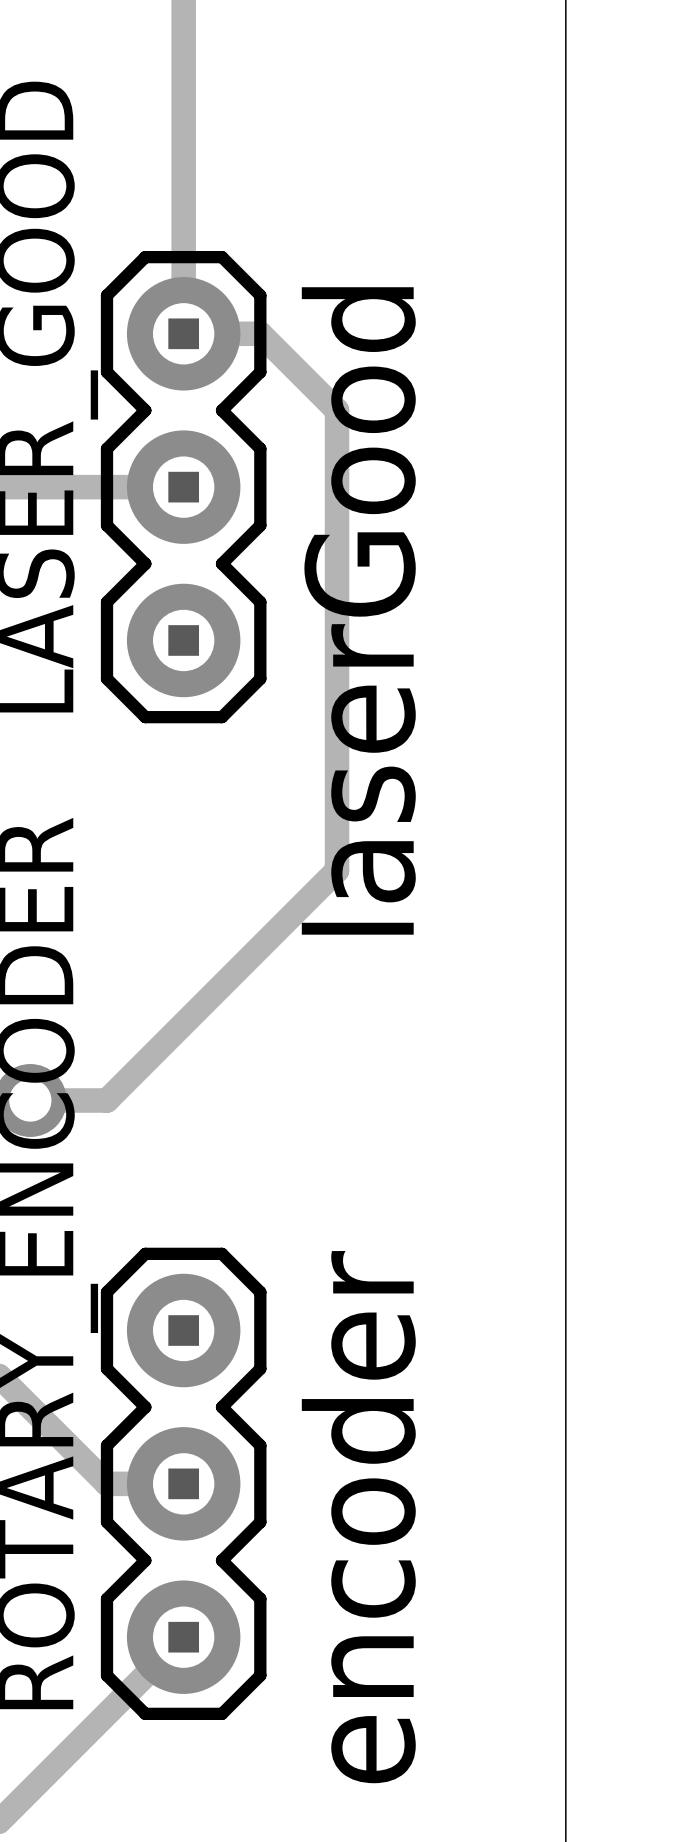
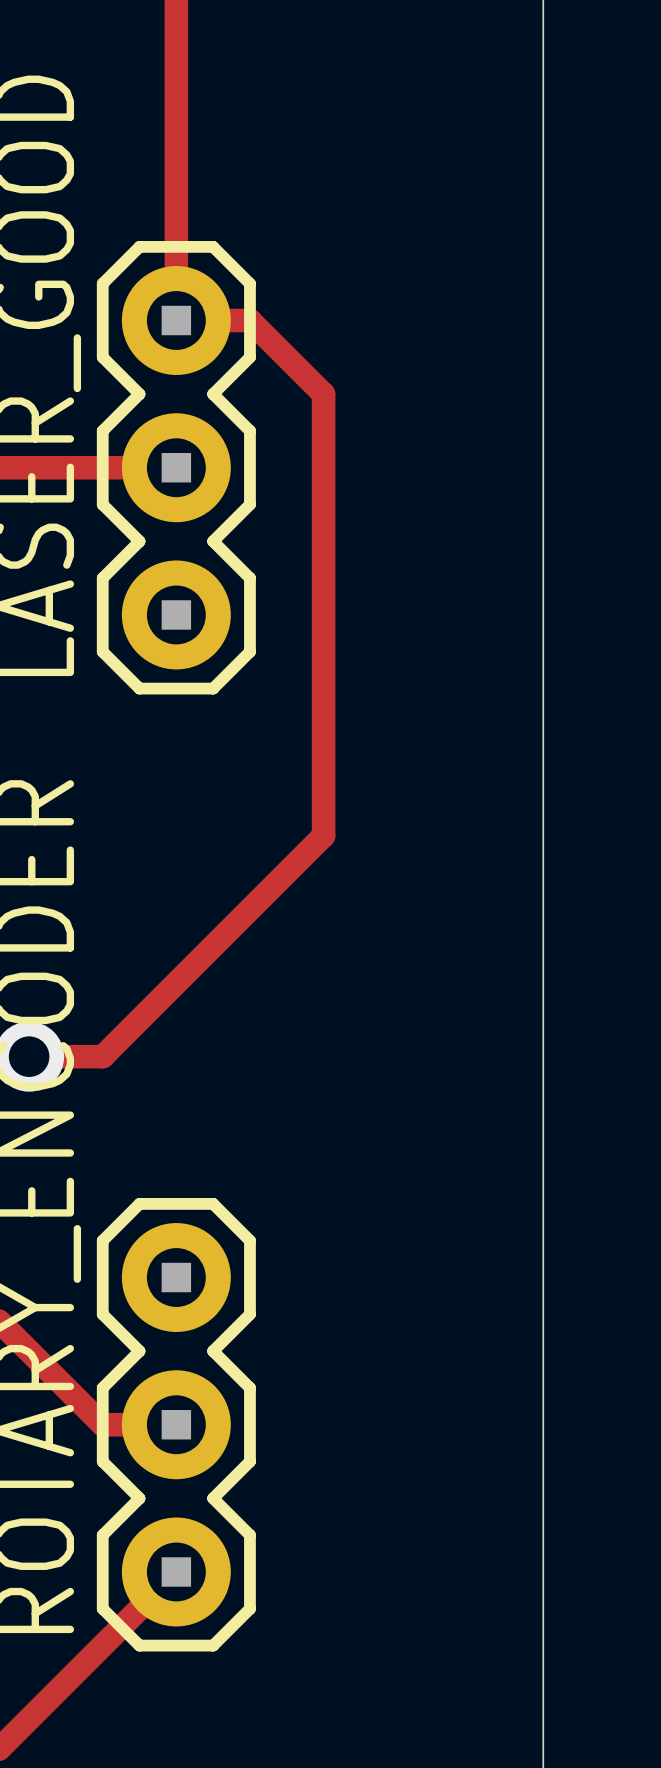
text: laserGood (358, 610) -> none
text: encoder (358, 1517) -> none

